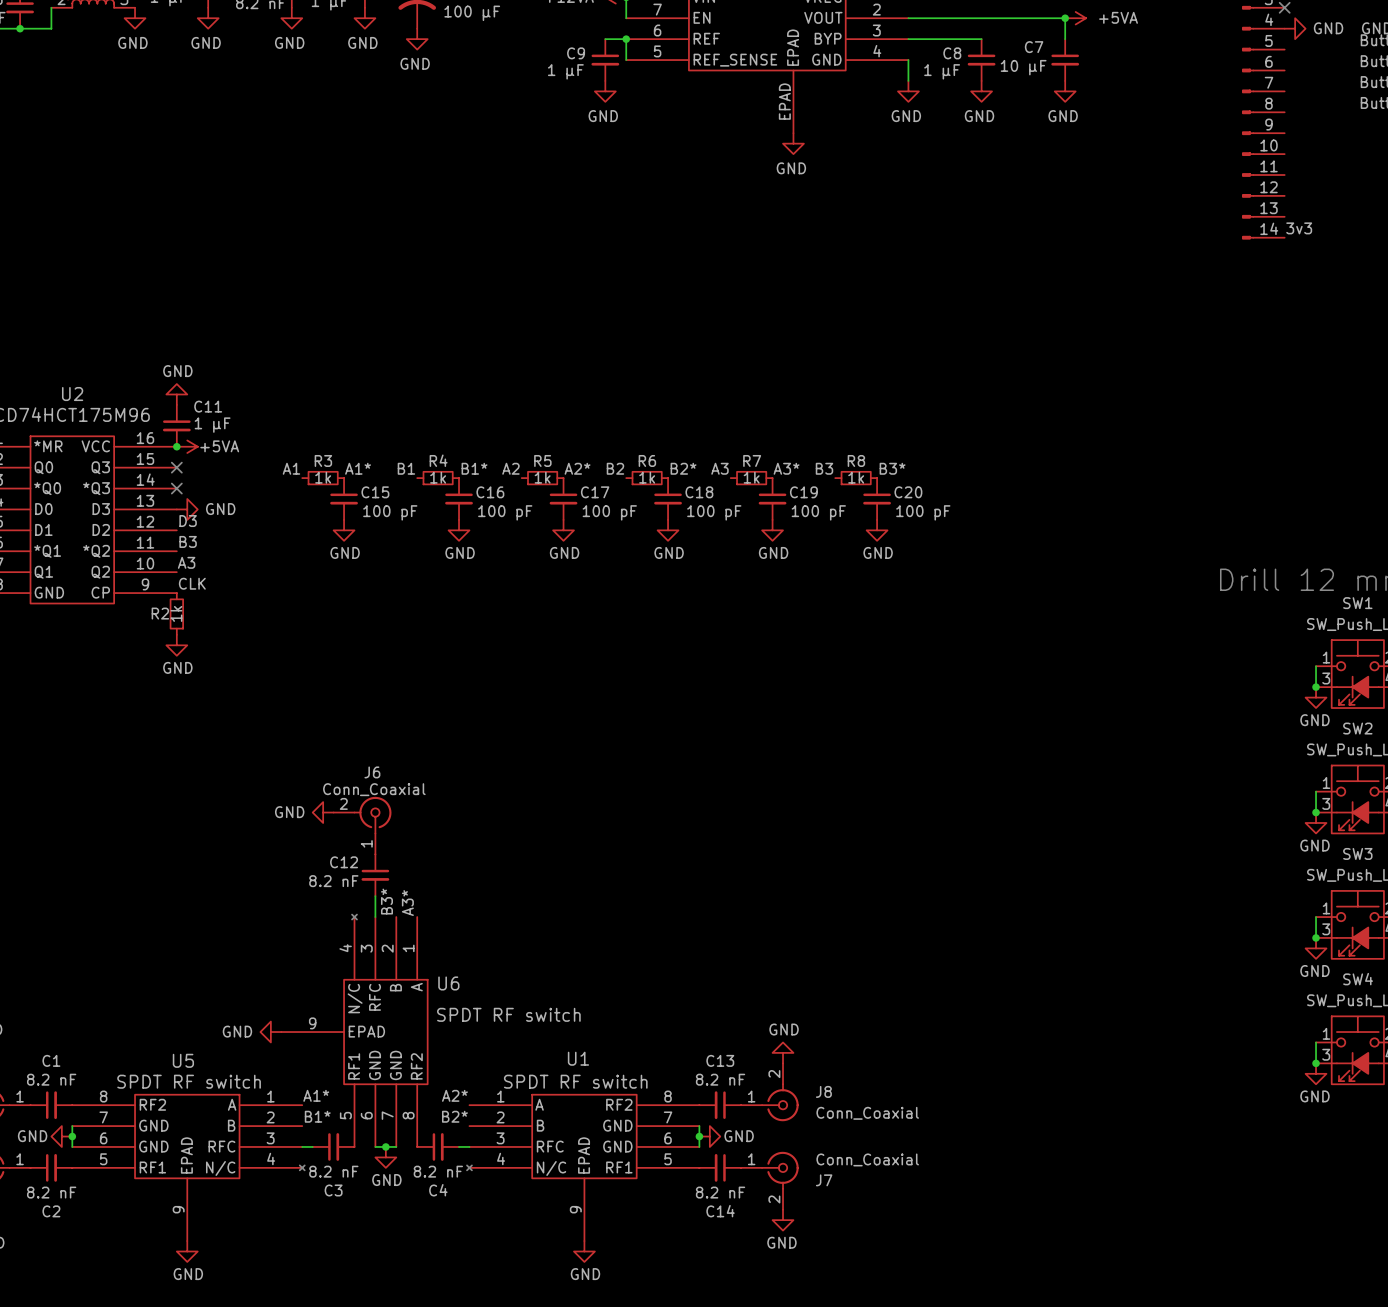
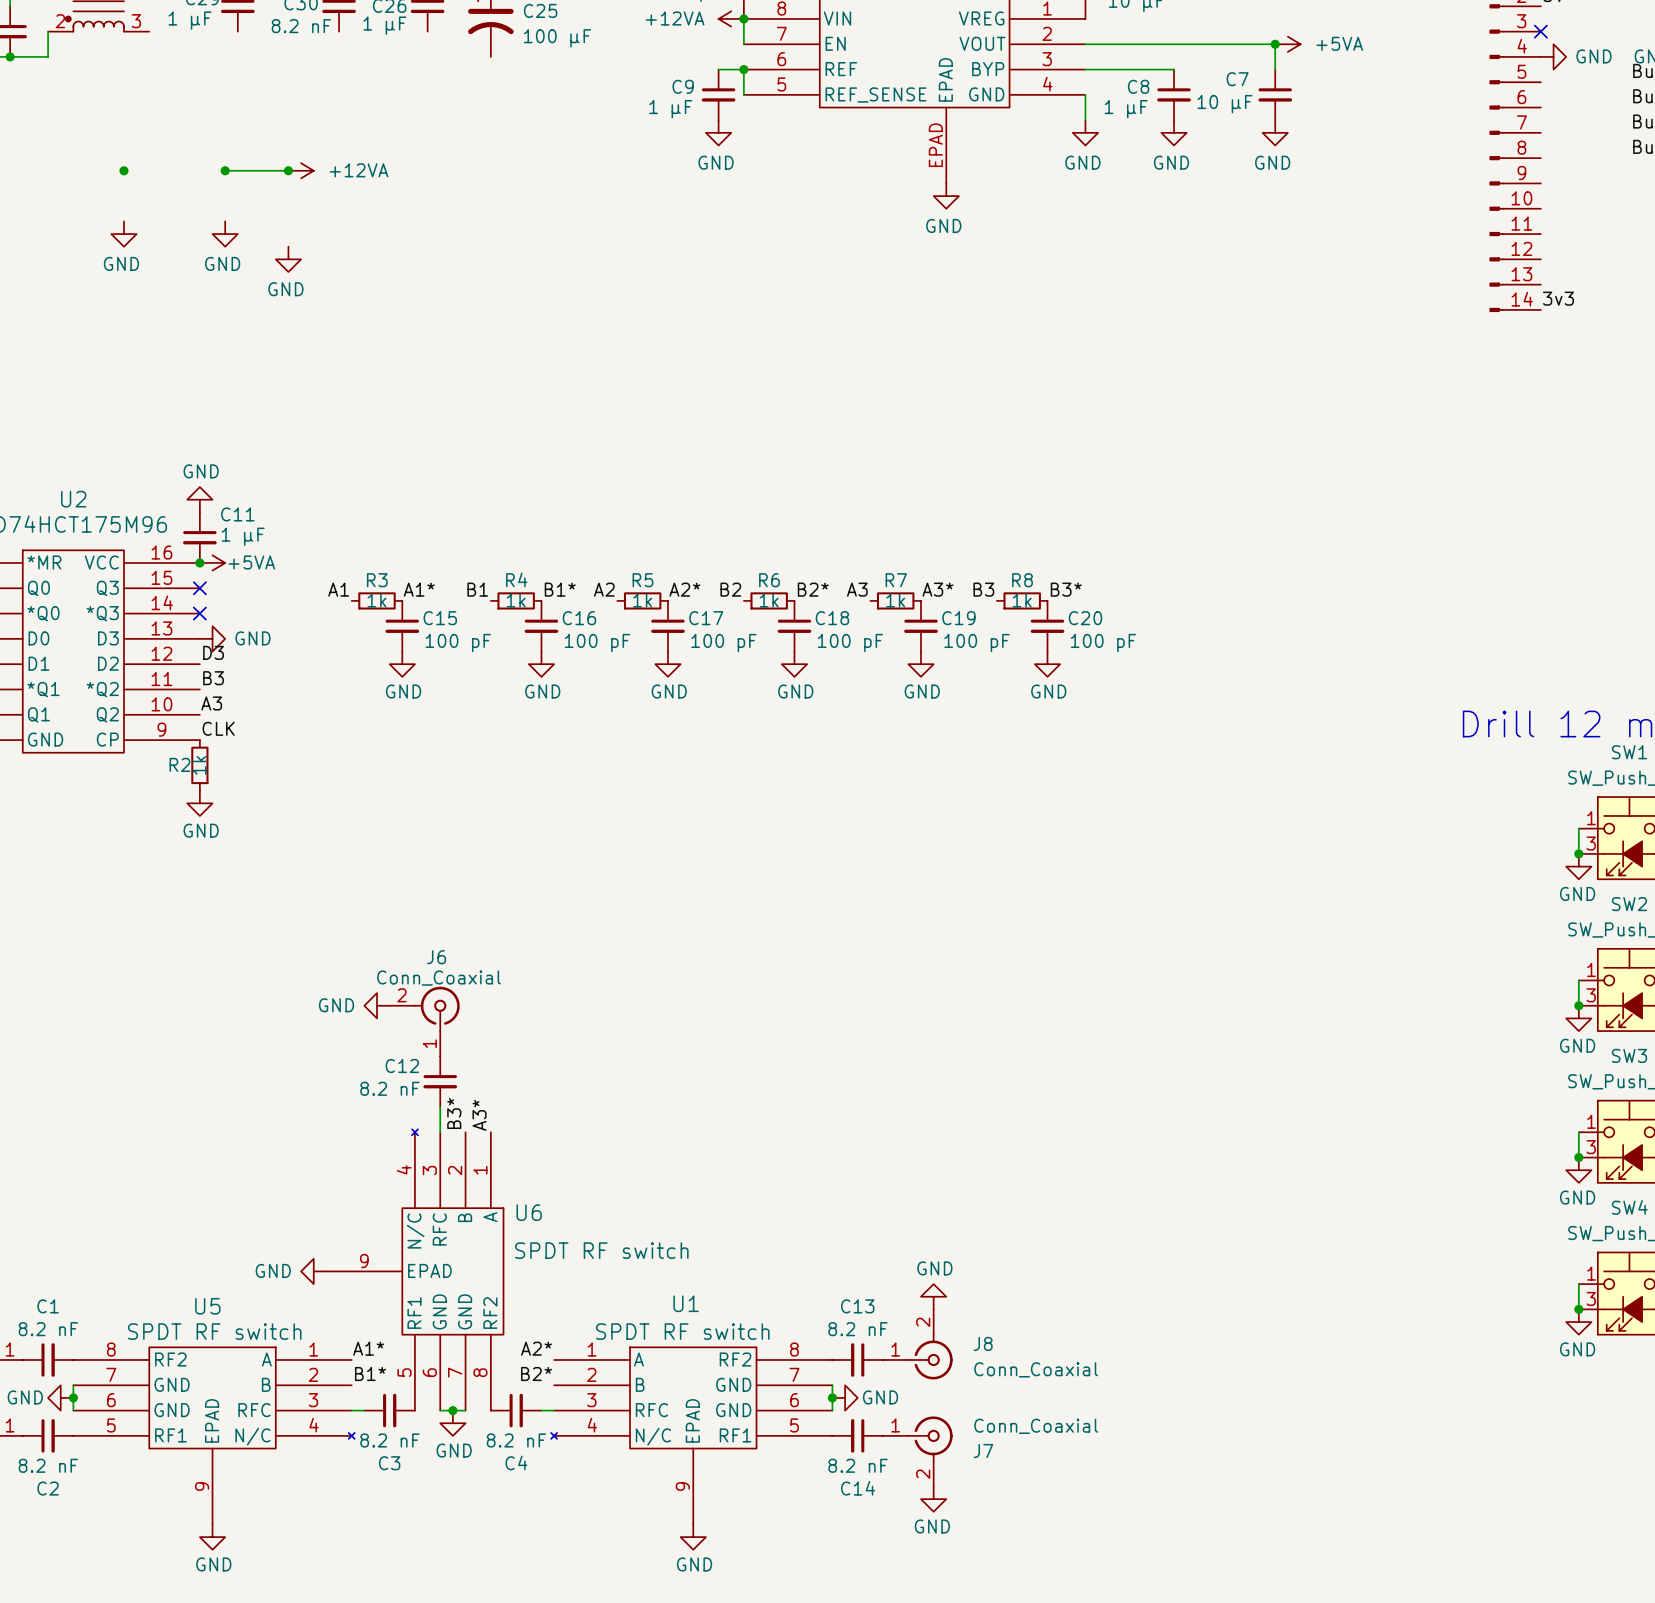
power symbol: GND (135, 18) -> none
power symbol: GND (208, 18) -> none
power symbol: GND (291, 18) -> none
power symbol: GND (364, 18) -> none
power symbol: GND (417, 39) -> none
junction: none -> (123, 170)
wire: none -> (225, 170) (288, 170)
junction: none -> (225, 170)
junction: none -> (288, 170)
power symbol: none -> +12VA (301, 170)
power symbol: none -> GND (123, 234)
power symbol: none -> GND (225, 234)
power symbol: none -> GND (288, 259)

